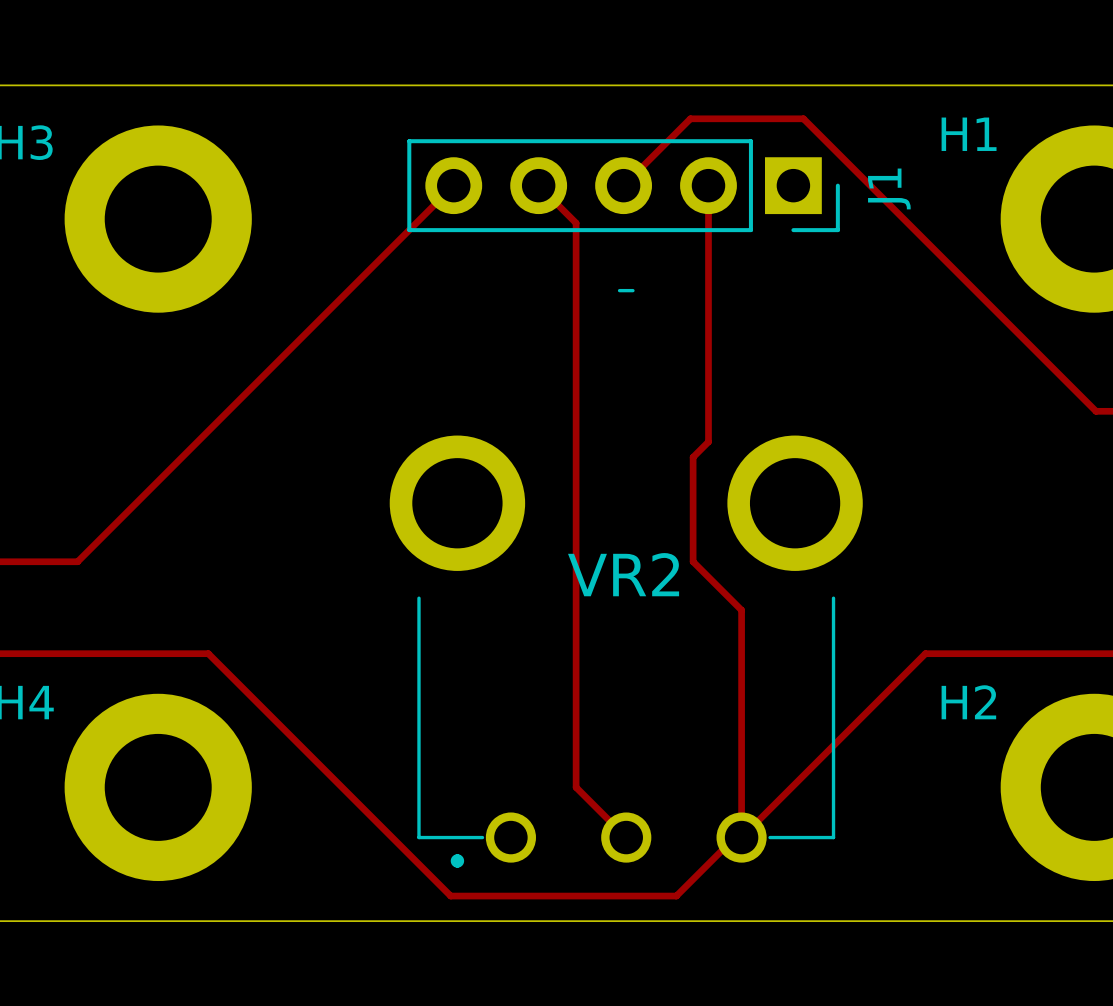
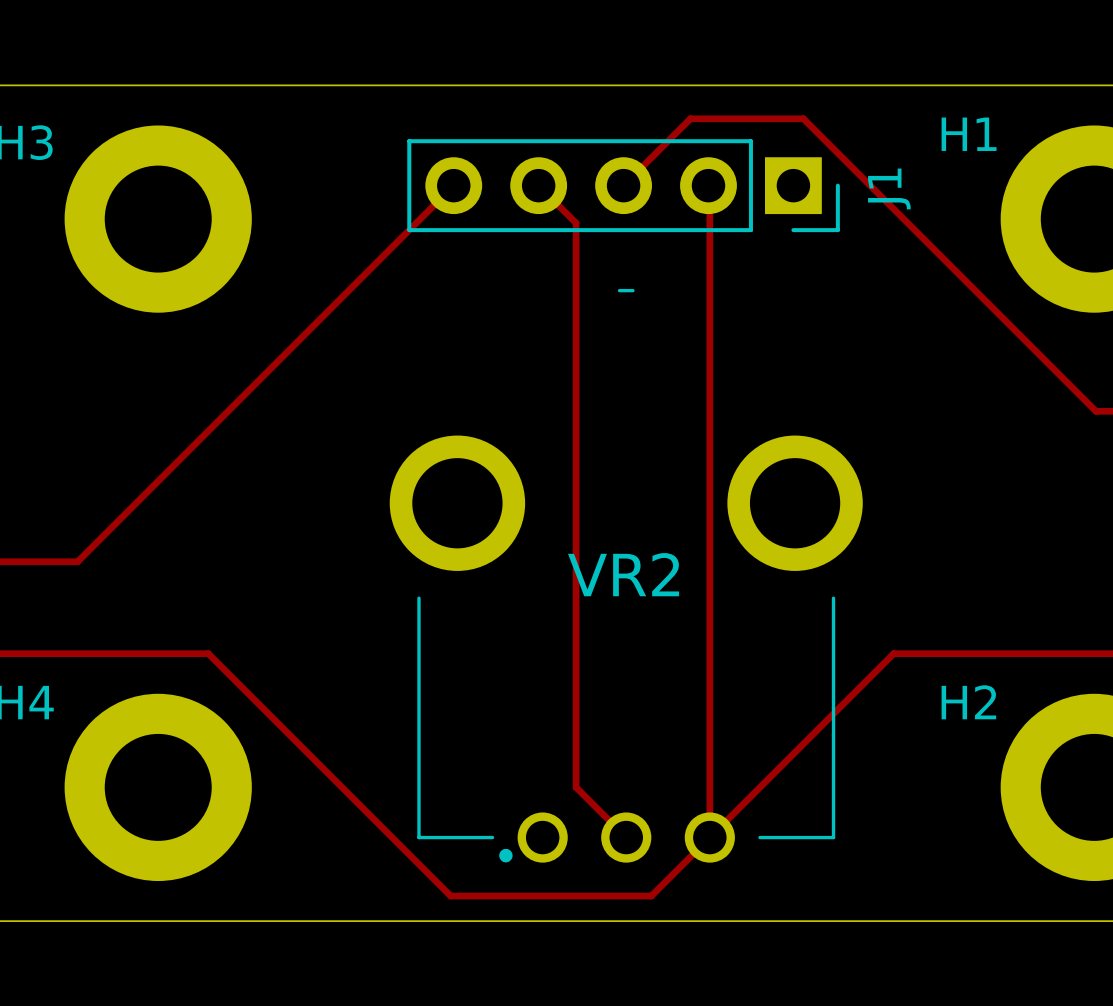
track: (708, 185) (708, 441) (693, 457) (693, 561) (741, 610) (741, 830) (676, 896) (651, 896) -> (708, 185) (709, 837)
VR2 footprint: [389, 288, 863, 868] -> [389, 288, 863, 863]
track: (925, 653) (741, 837) -> (925, 653) (893, 653) (651, 896)

